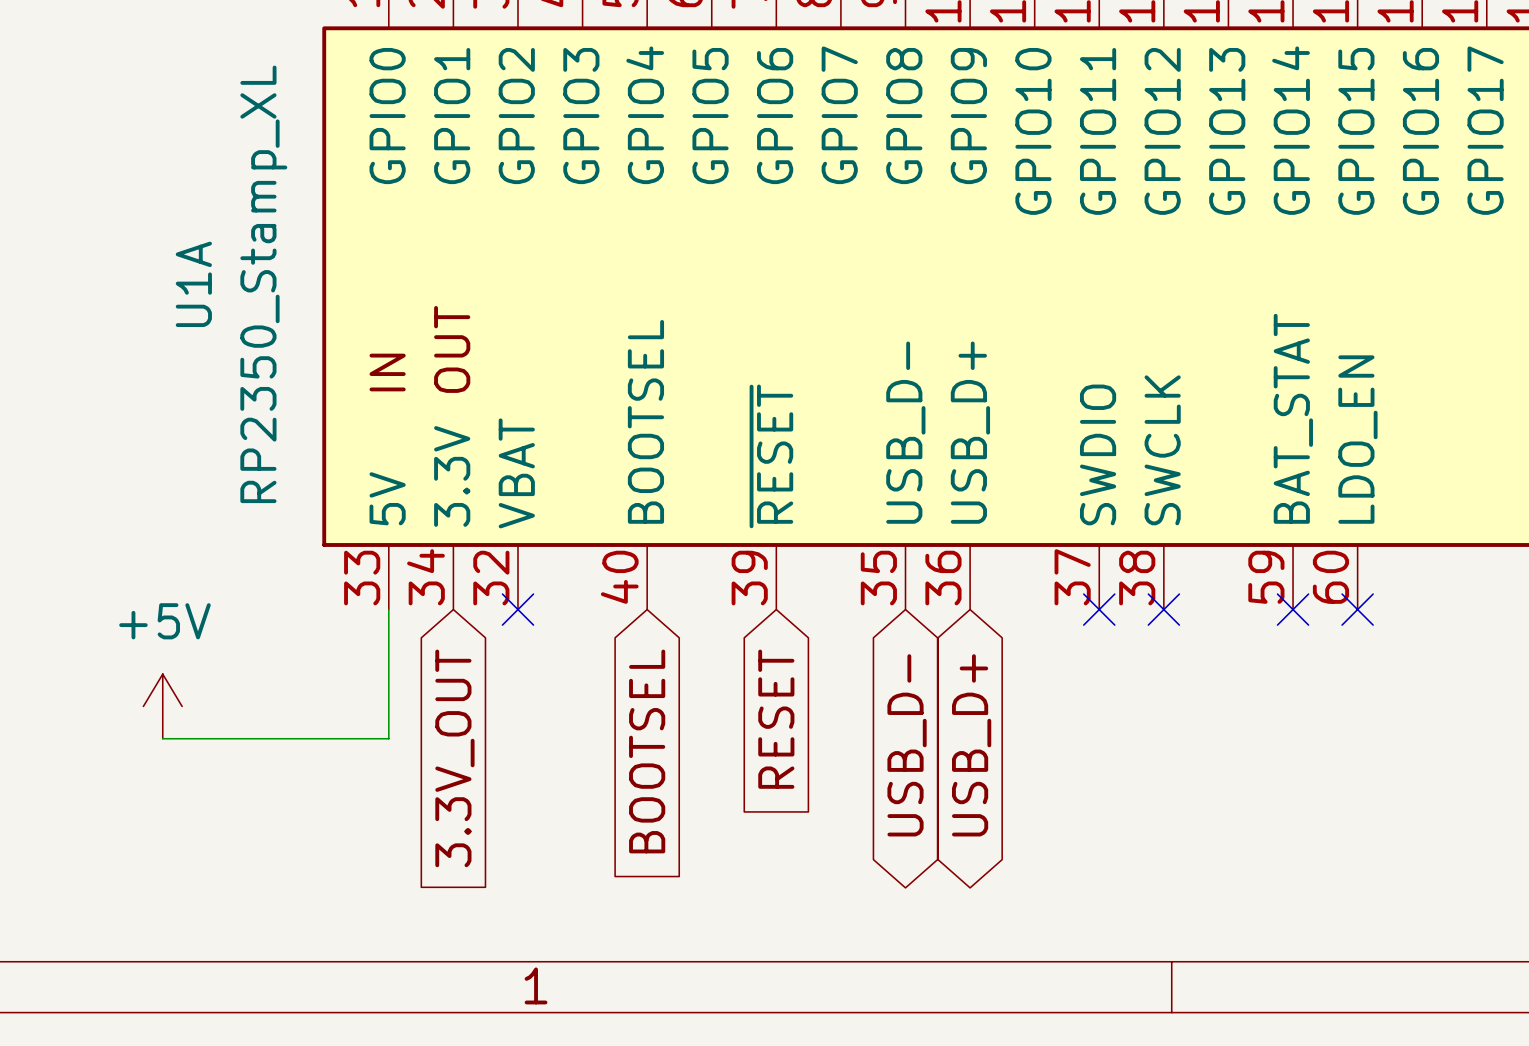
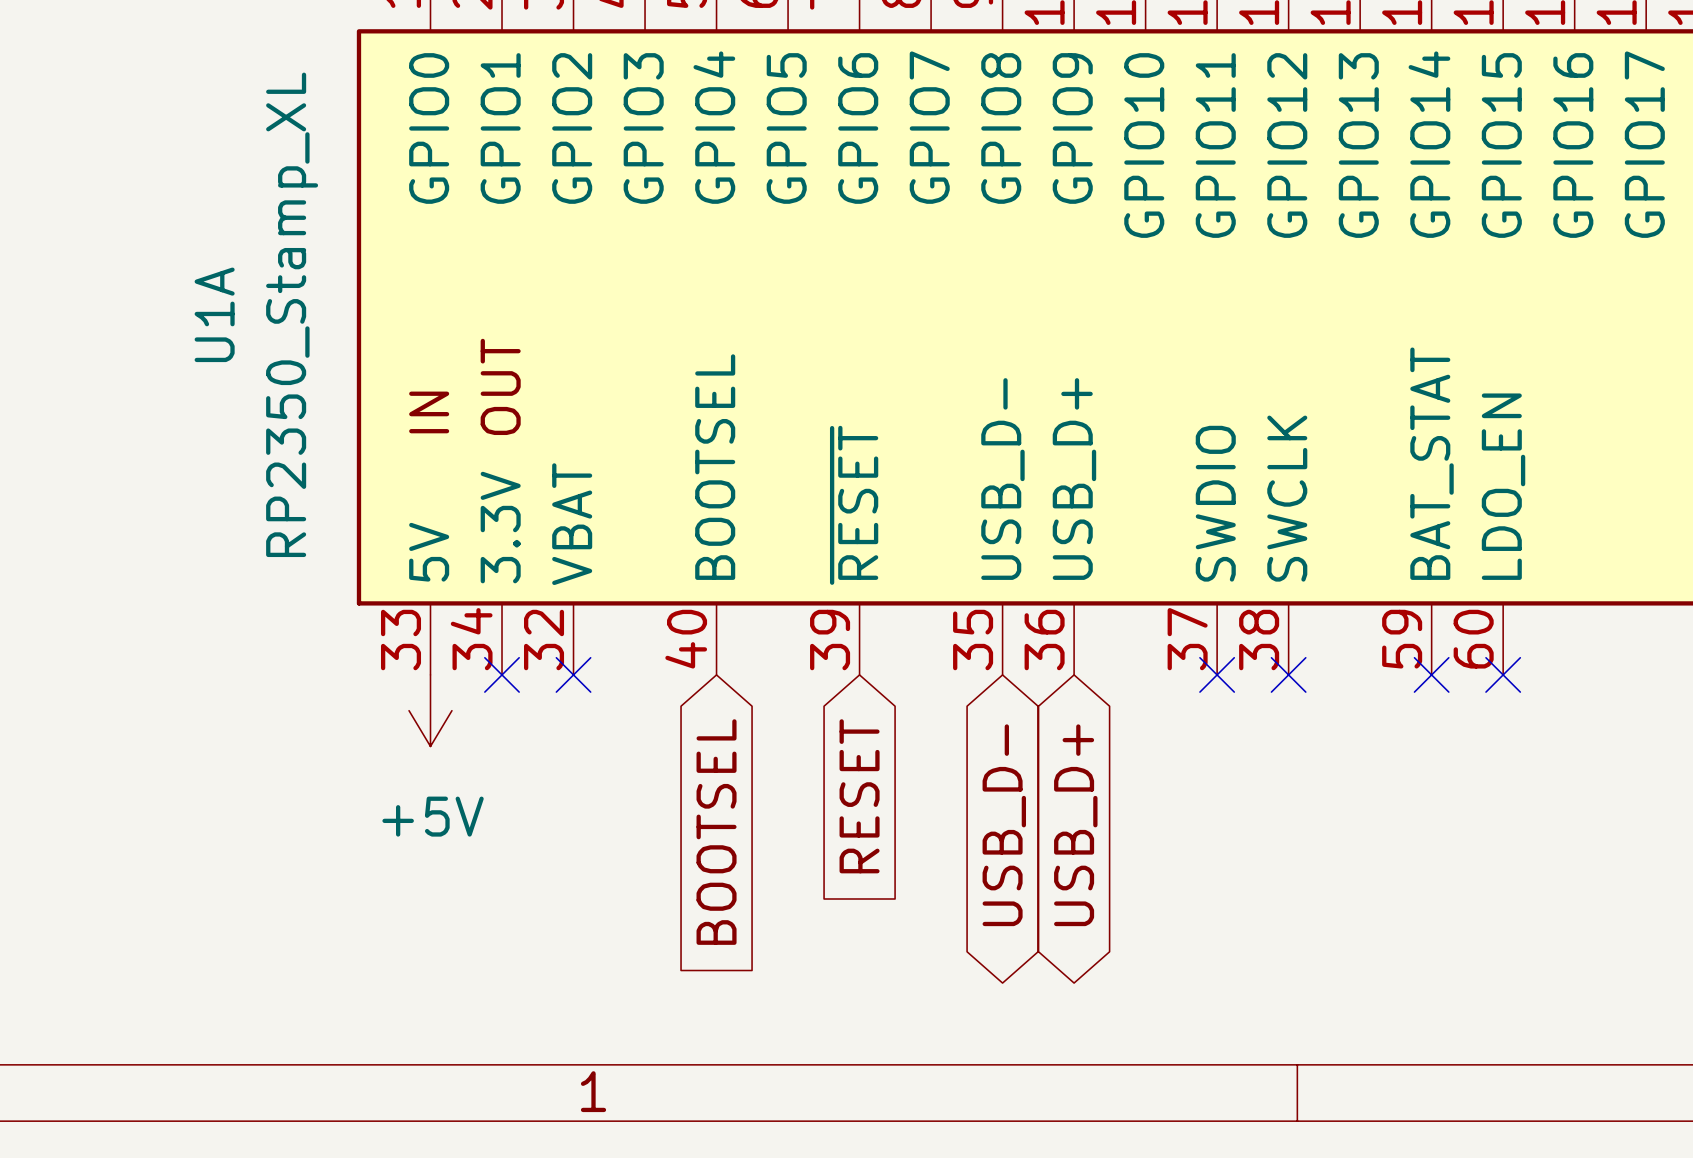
wire: (388, 609) (388, 738) (162, 738) -> none
no-connect mark: none -> (502, 674)
power symbol rotation: 0° (162, 706) -> 180° (430, 710)
power symbol position: +5V (162, 706) -> +5V (430, 710)
global label: 3.3V_OUT (454, 758) -> none

